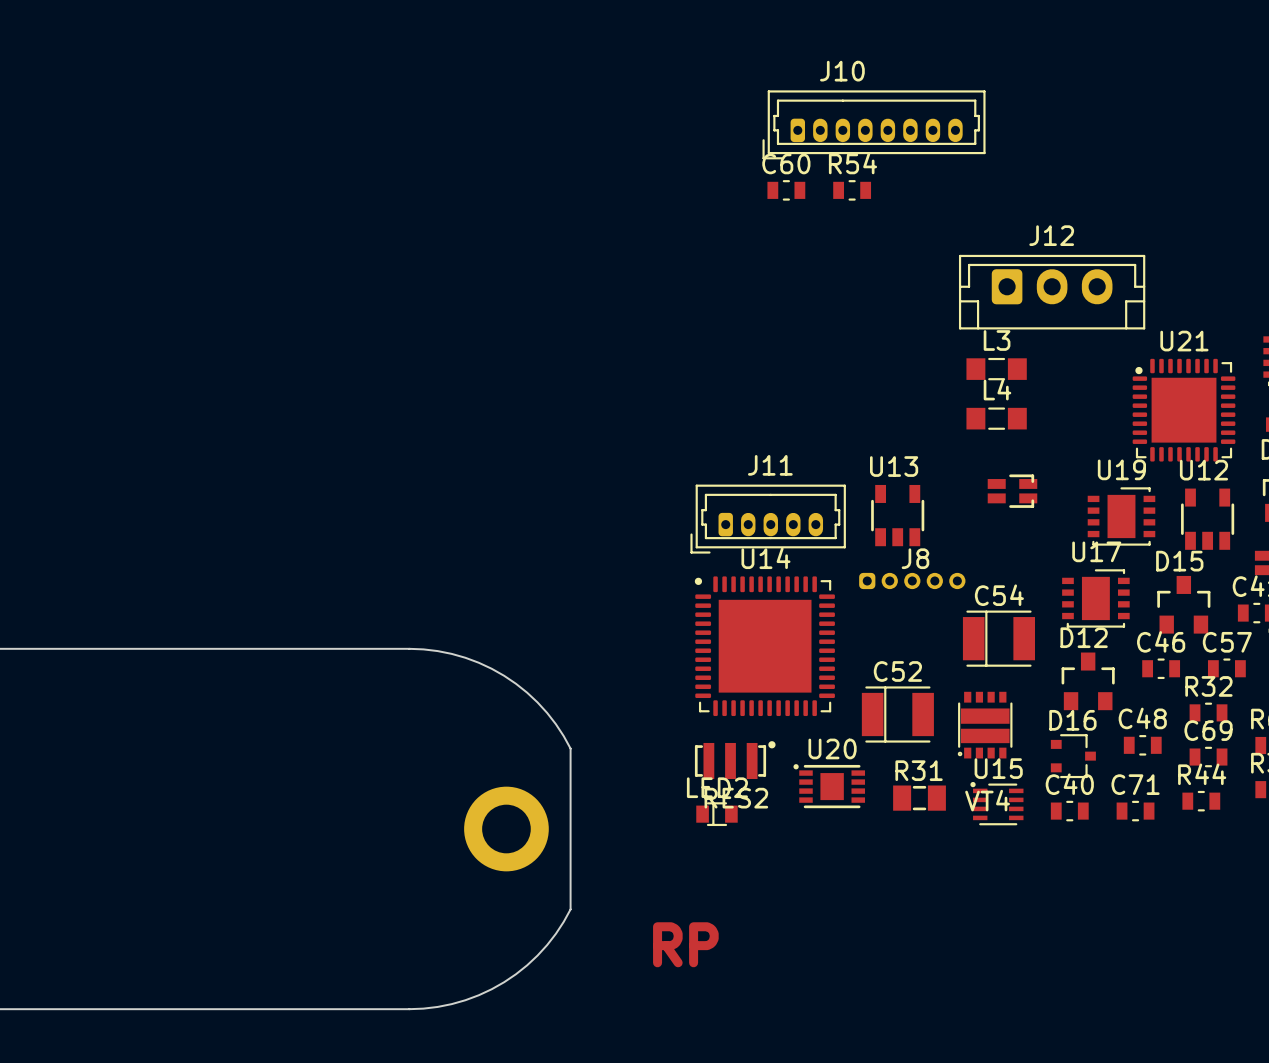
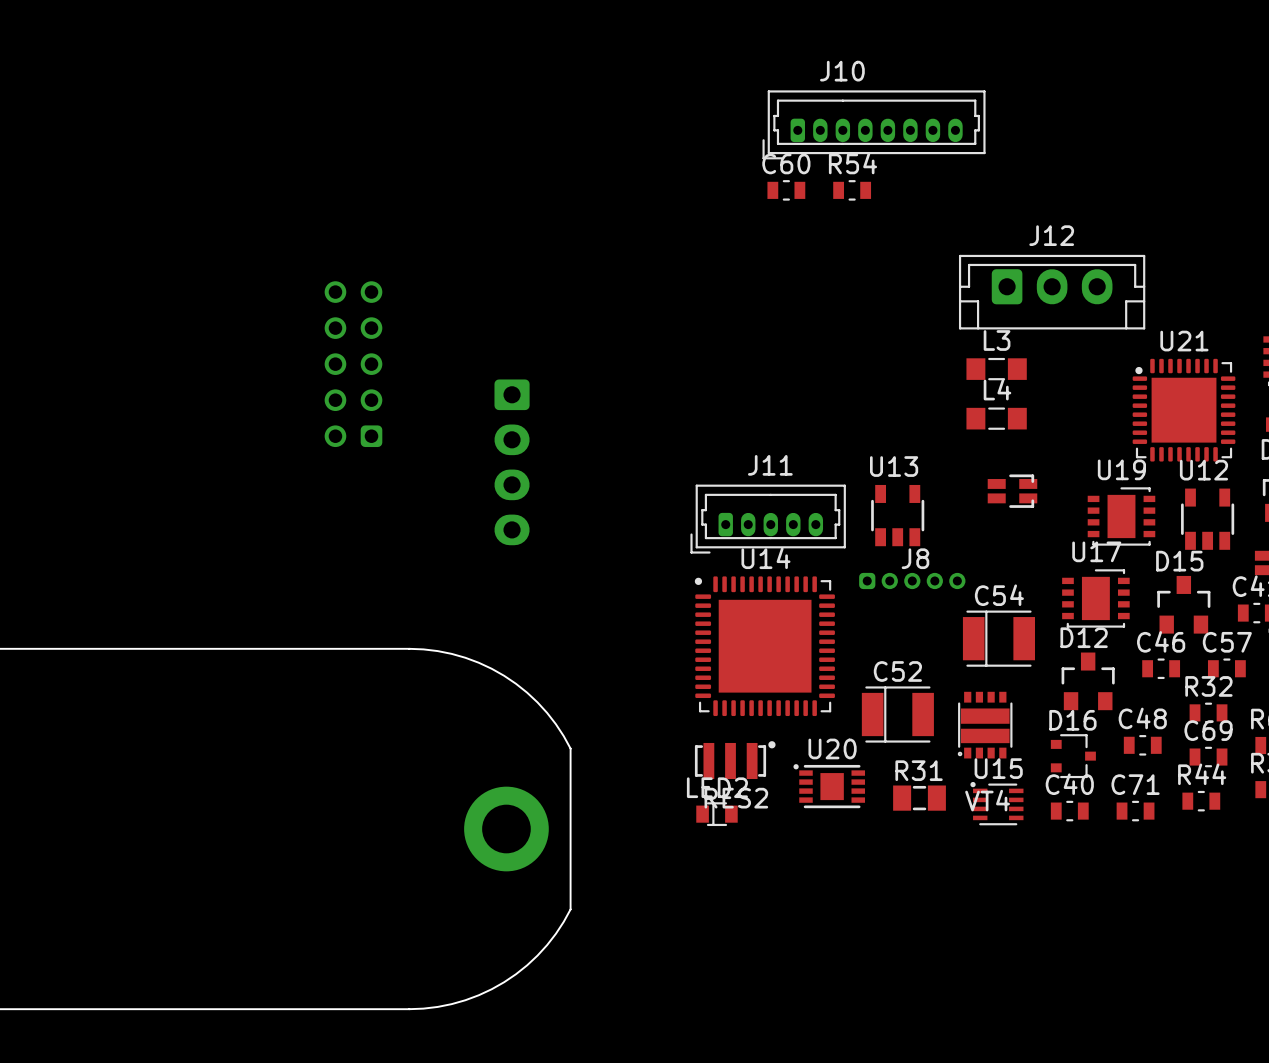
part: none -> (353, 364)
part: none -> (512, 462)
text: RP (685, 944) -> none

